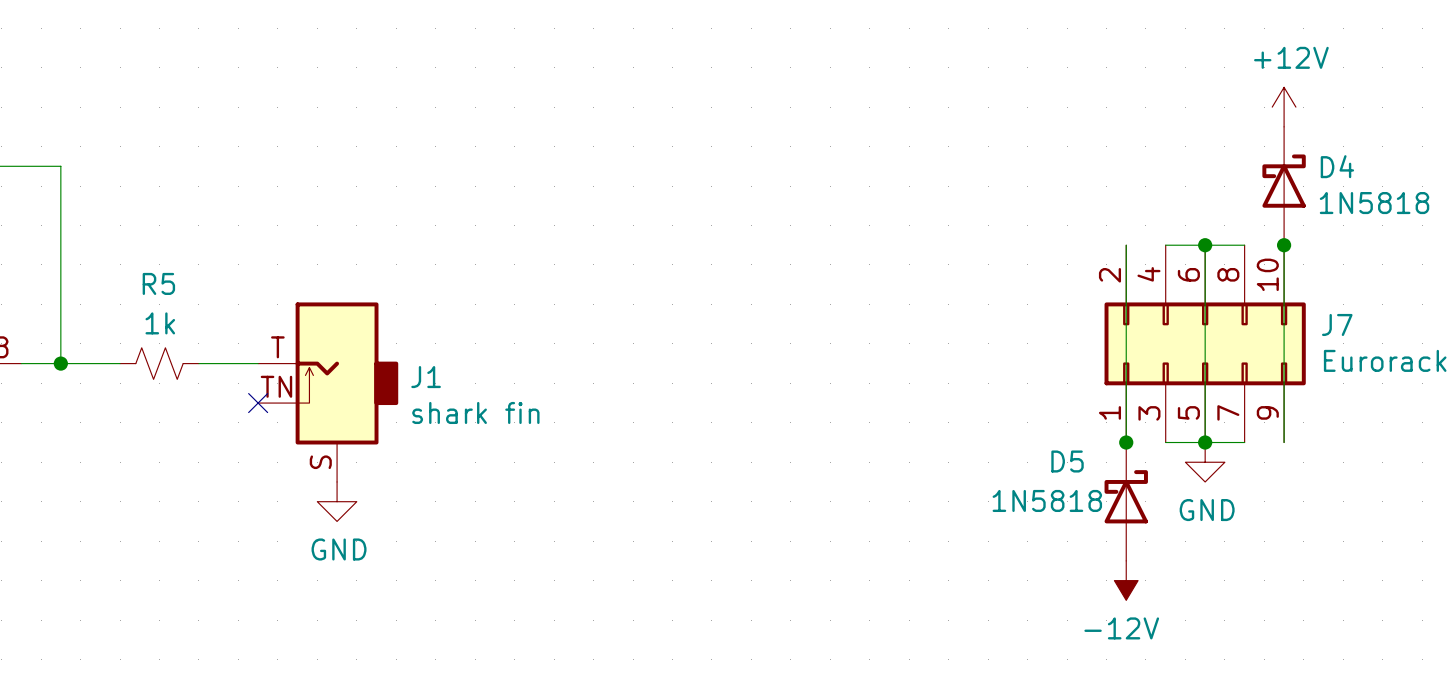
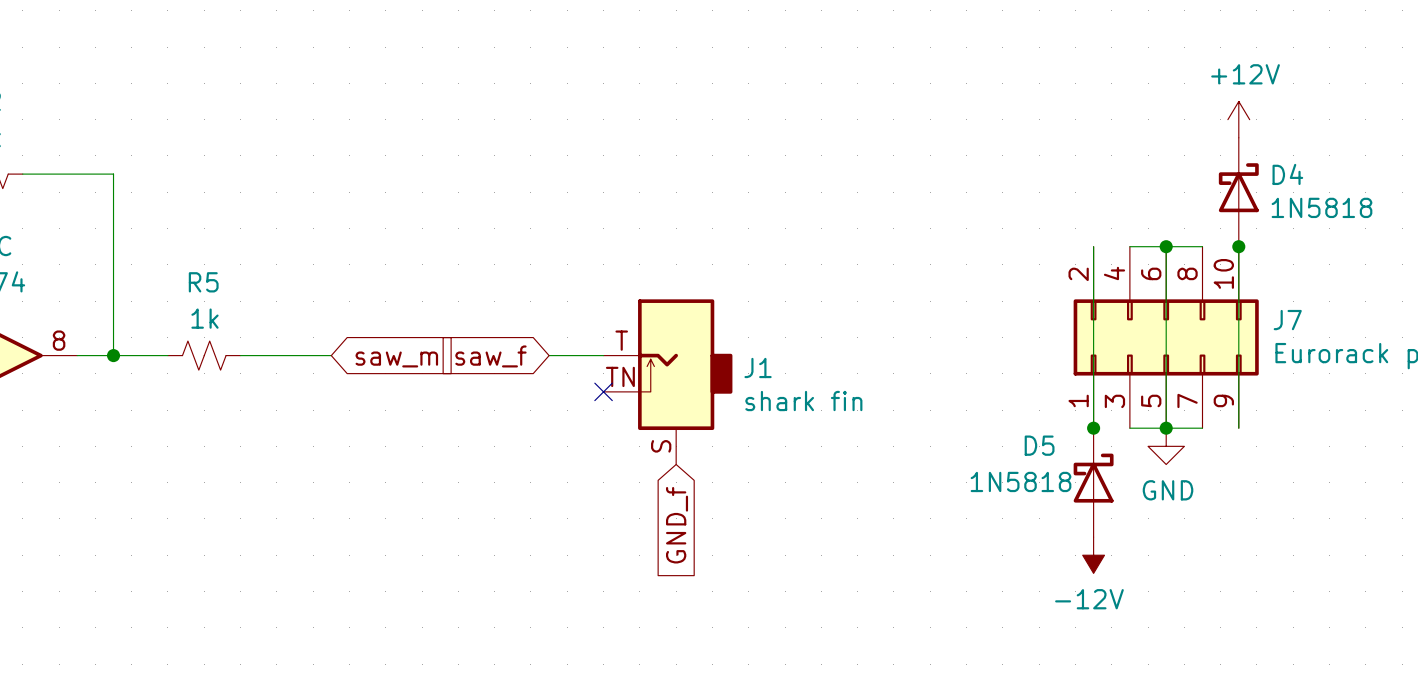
wire: none -> (549, 355) (603, 355)
global label: none -> saw_f (490, 356)
global label: none -> saw_m (396, 359)
J1 position: (328, 392) -> (667, 381)
no-connect mark: (258, 403) -> none
no-connect mark: none -> (603, 391)
power symbol: GND (337, 501) -> none
global label: none -> GND_f (677, 525)

